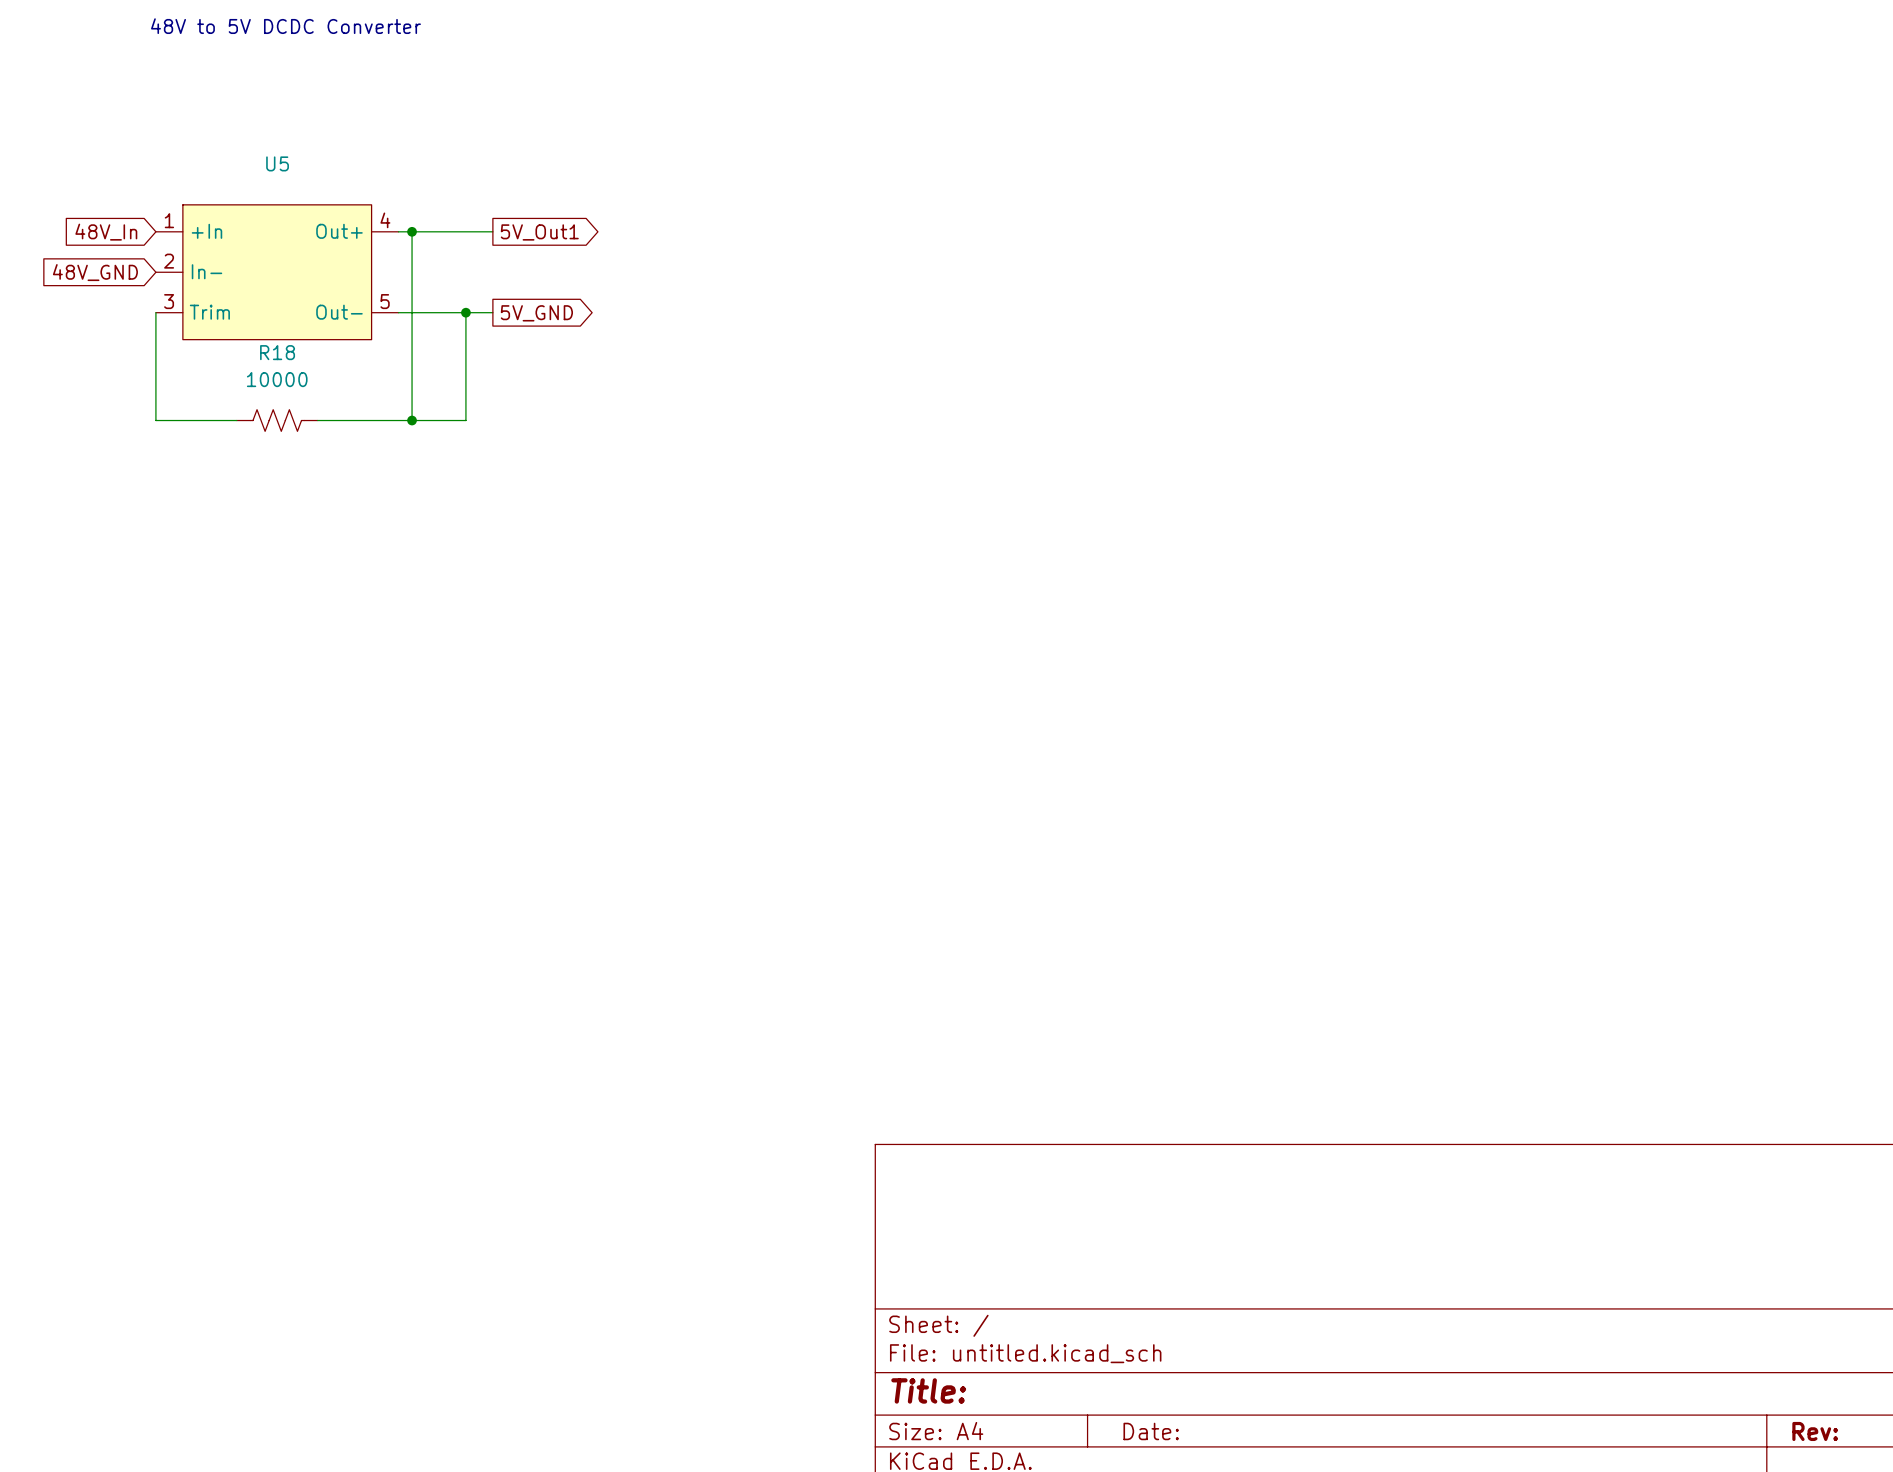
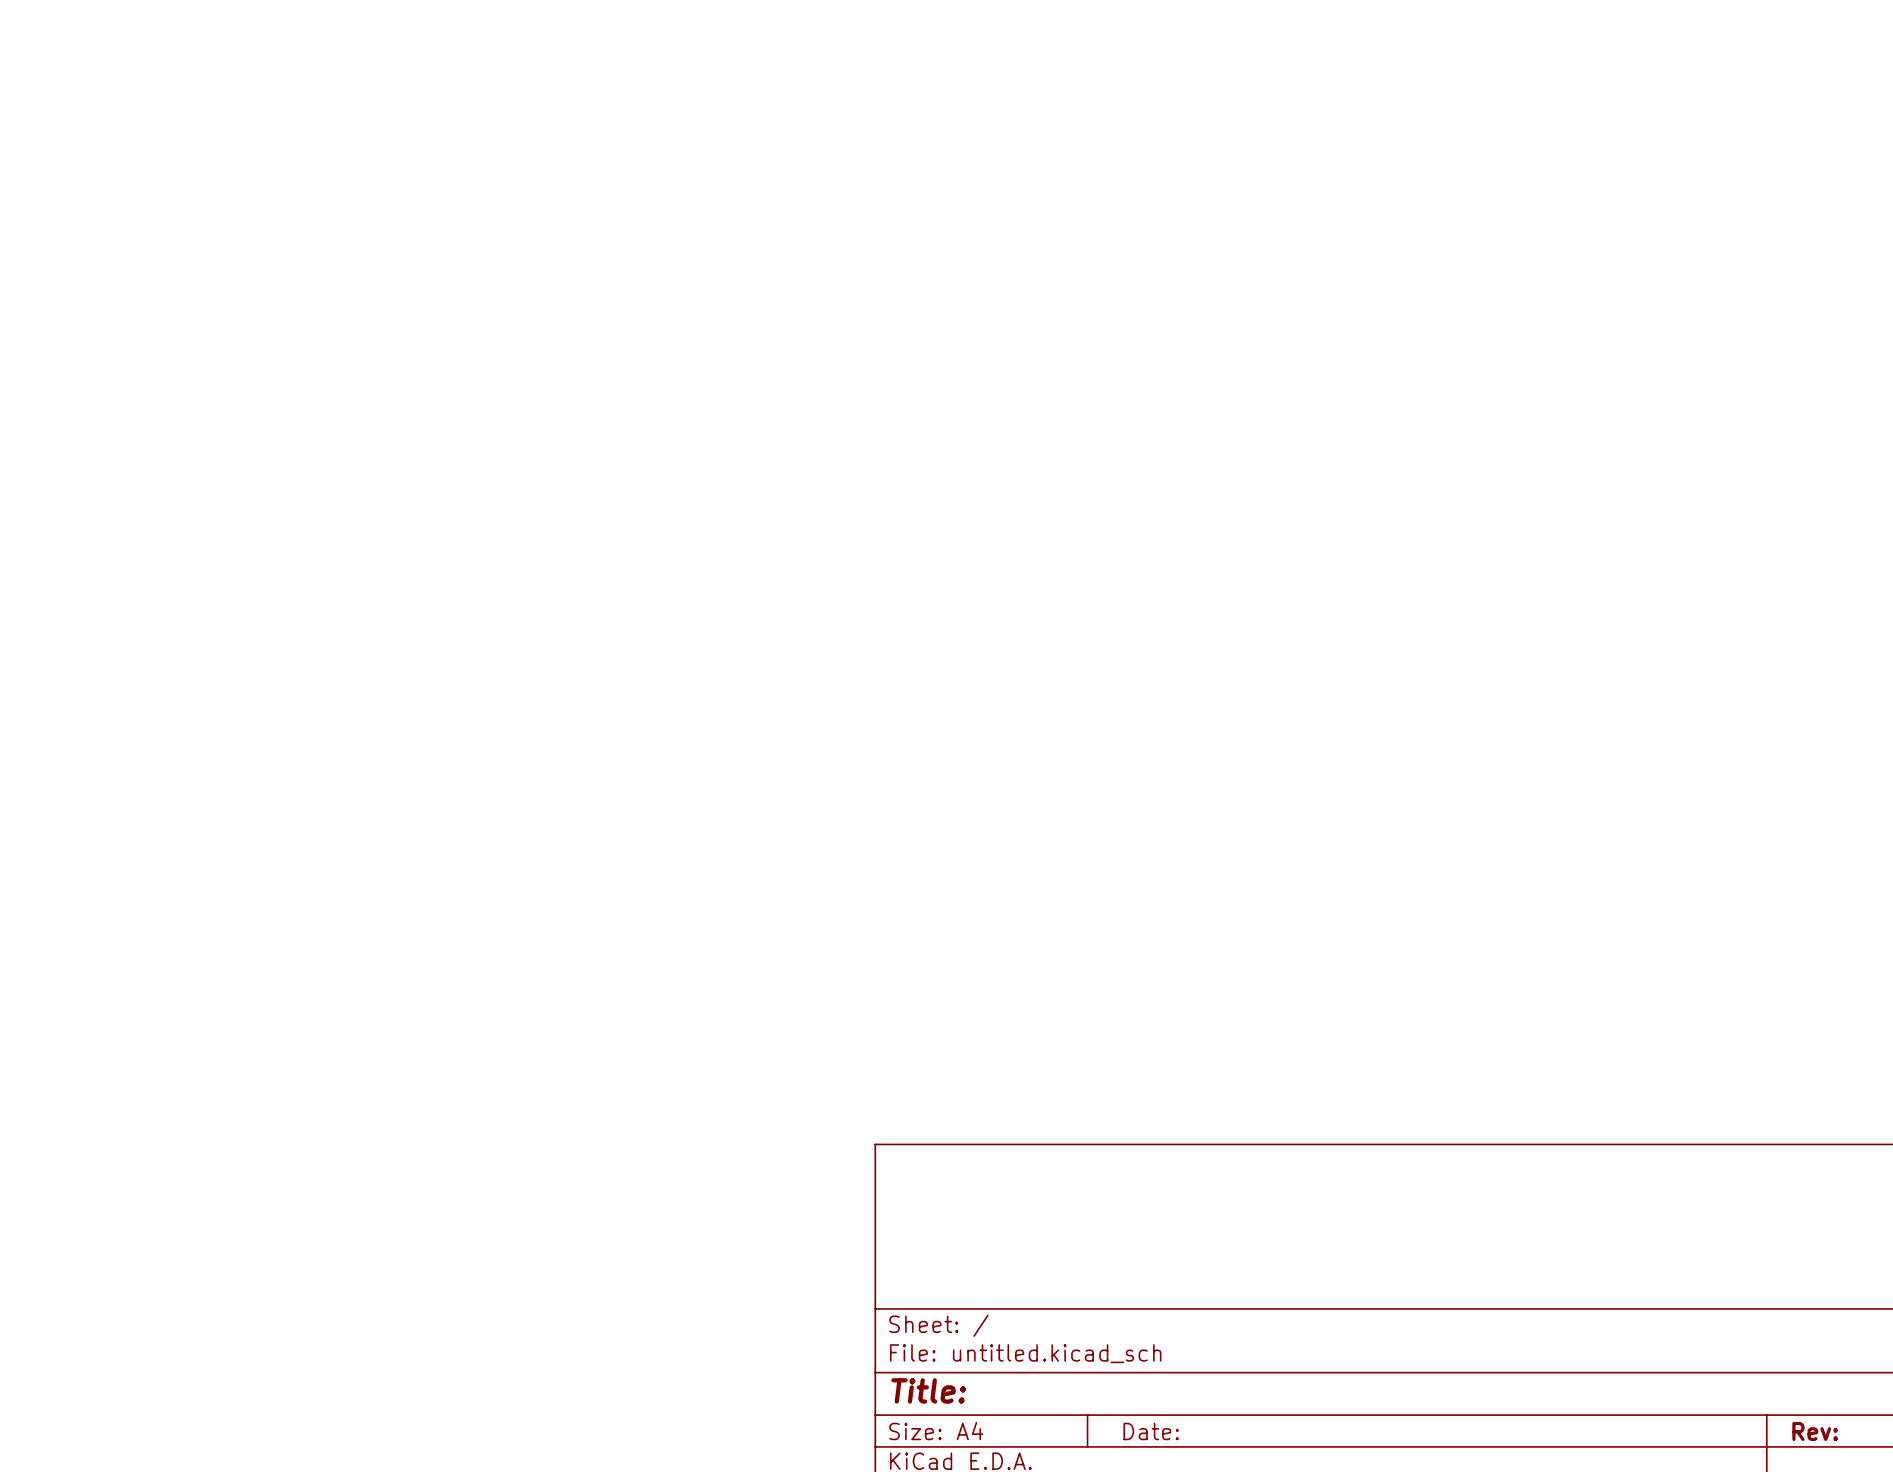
text: 48V to 5V DCDC Converter (285, 26) -> none
wire: (398, 231) (492, 231) -> none
wire: (412, 231) (412, 420) -> none
junction: (412, 231) -> none
global label: 48V_In (106, 232) -> none
global label: 5V_Out1 (539, 232) -> none
global label: 48V_GND (95, 272) -> none
U5: (277, 272) -> none
wire: (155, 312) (155, 420) (236, 420) -> none
wire: (398, 312) (492, 312) -> none
wire: (465, 312) (465, 420) (317, 420) -> none
junction: (465, 312) -> none
global label: 5V_GND (536, 313) -> none
R18: 10000 (277, 420) -> none
junction: (412, 420) -> none

